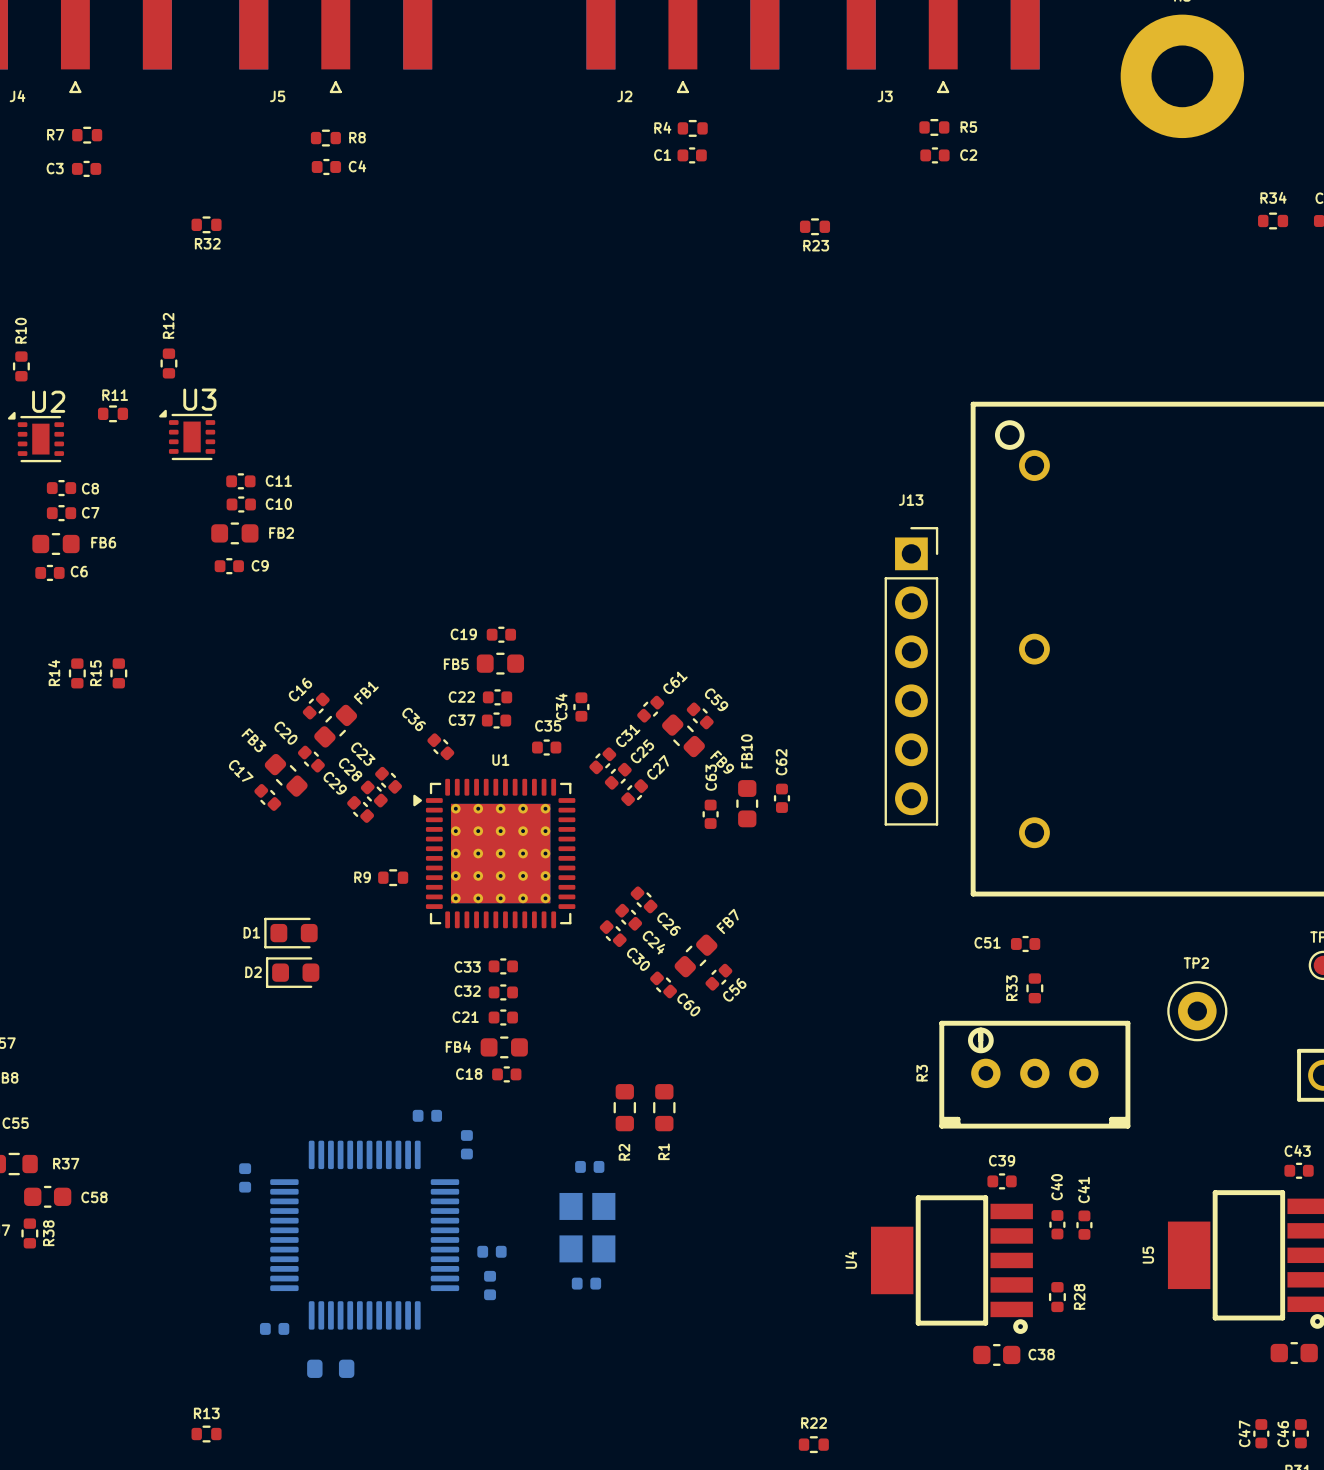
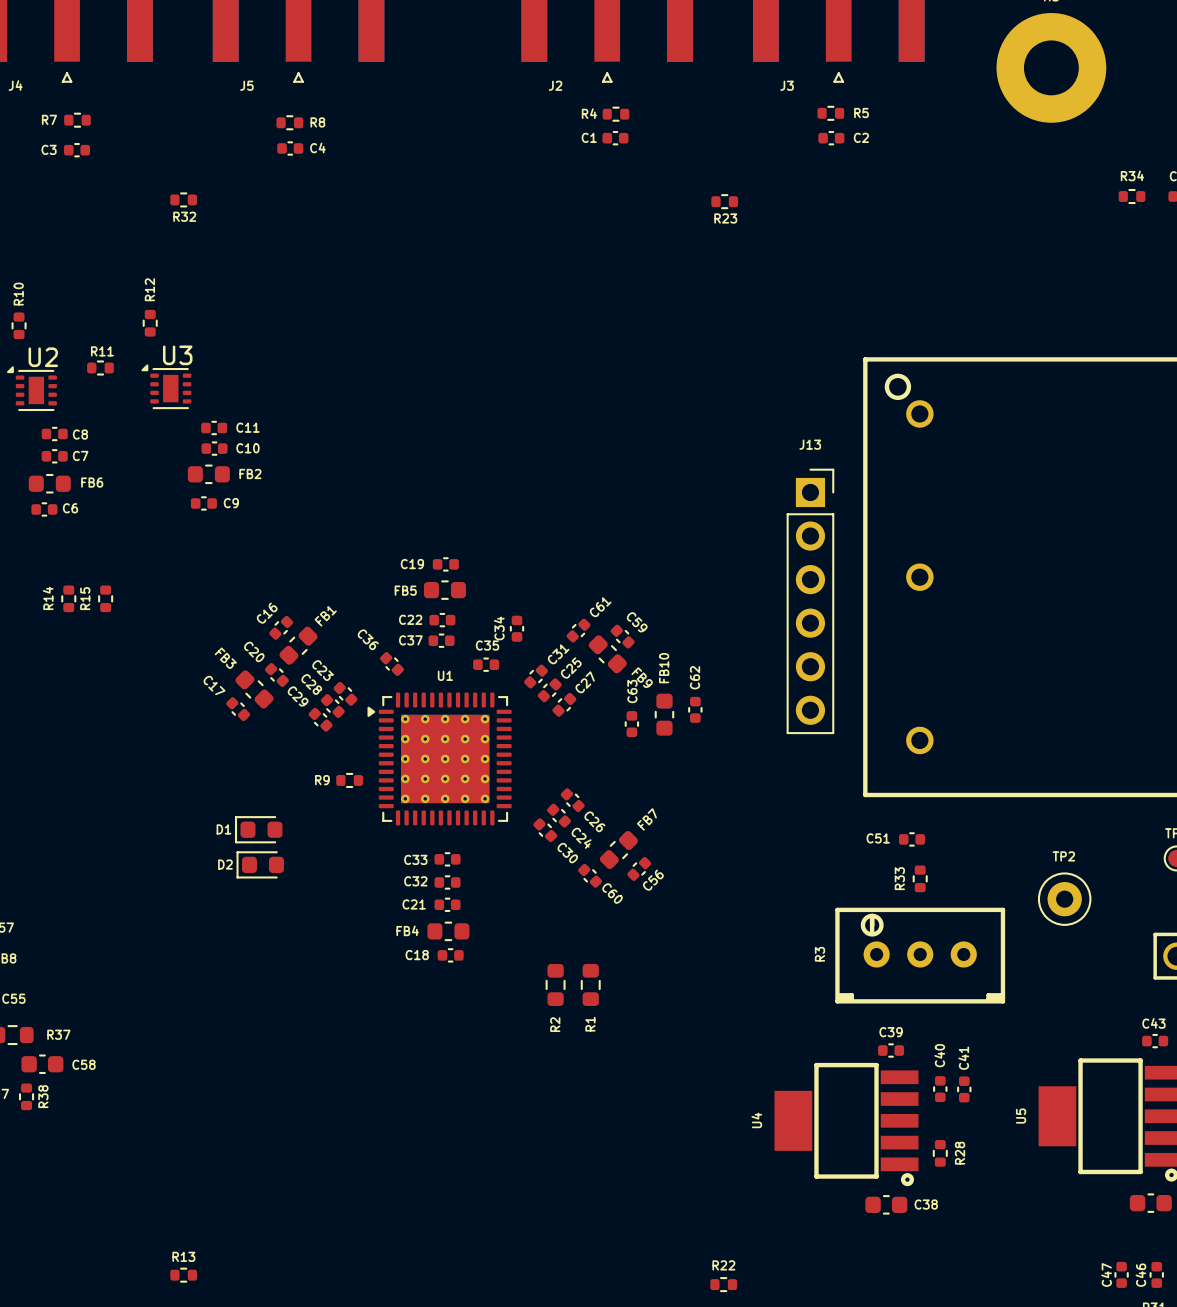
part: (427, 1115) -> none
part: (466, 1144) -> none
part: (589, 1166) -> none
part: (245, 1177) -> none
part: (587, 1227) -> none
part: (364, 1235) -> none
part: (491, 1251) -> none
part: (586, 1283) -> none
part: (490, 1285) -> none
part: (274, 1328) -> none
part: (330, 1368) -> none

